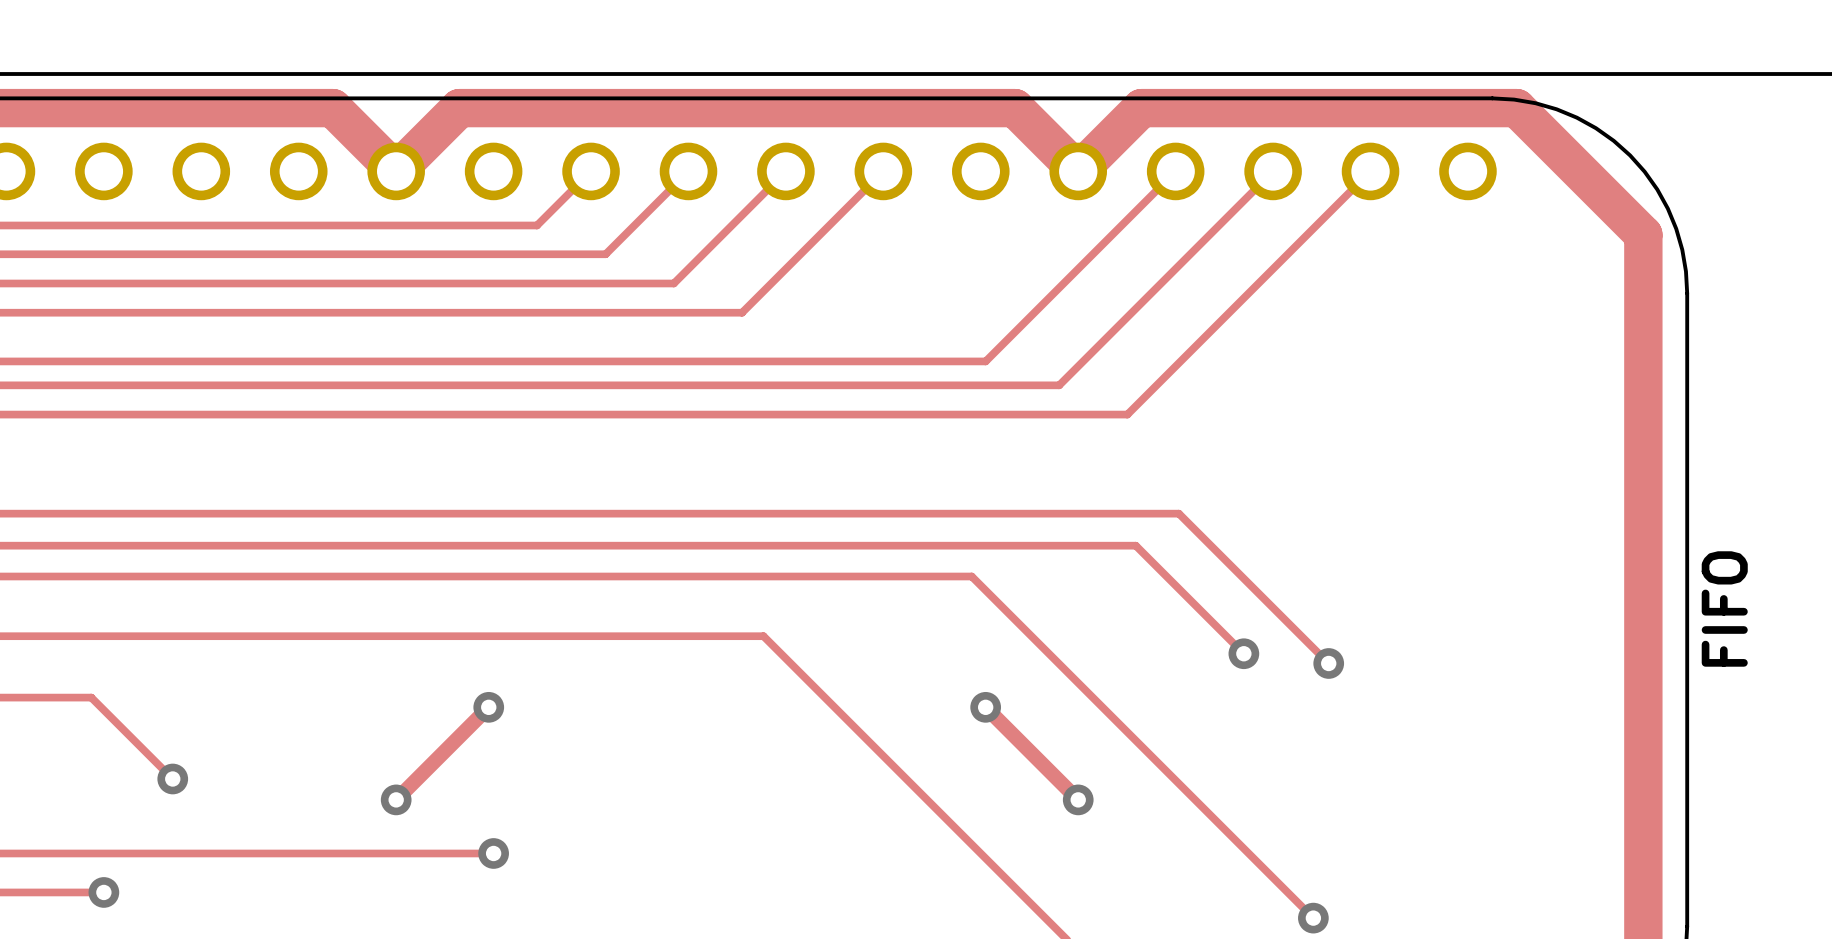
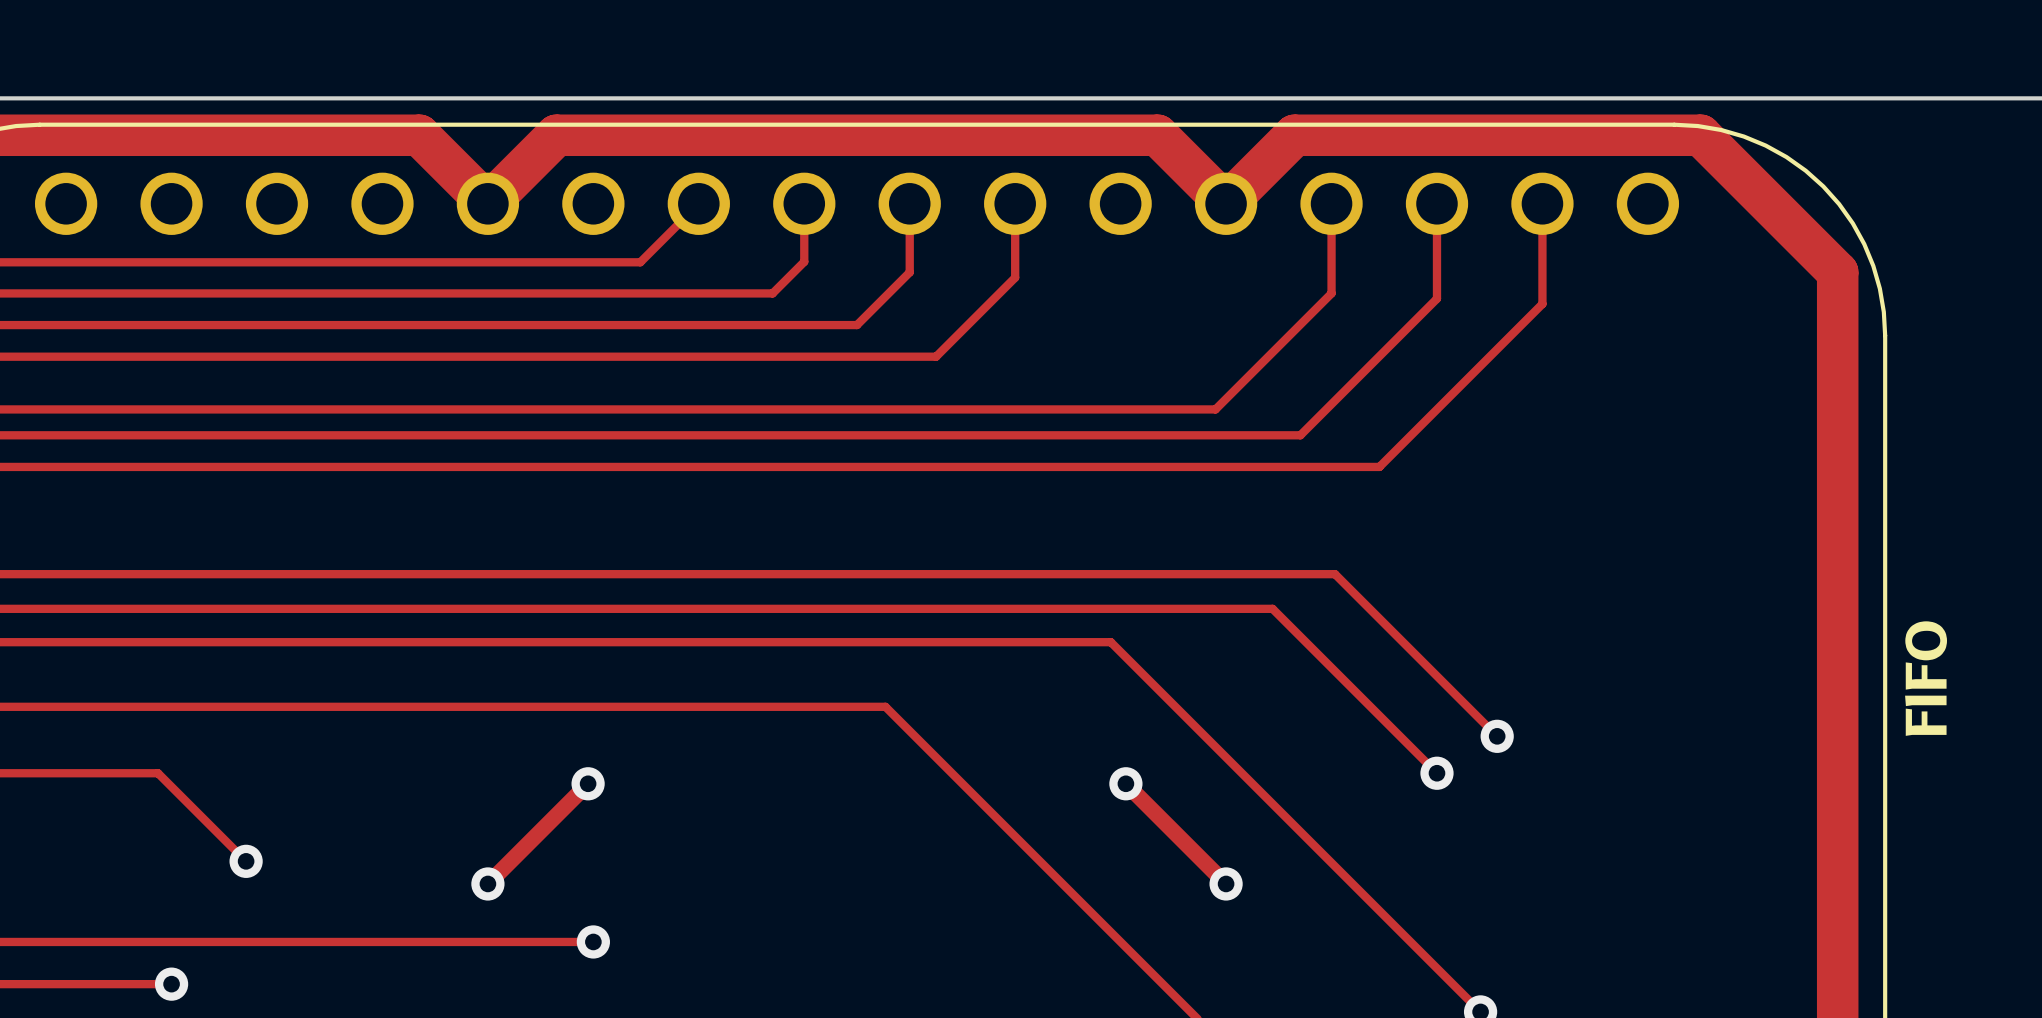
track: (688, 171) (605, 254) -> (804, 203) (804, 261) (772, 293) (714, 293)
track: (785, 171) (673, 283) -> (909, 203) (909, 272) (857, 325) (788, 325)
track: (883, 171) (742, 312) -> (1015, 203) (1015, 277) (936, 356) (862, 356)
track: (1175, 171) (985, 361) -> (1331, 203) (1331, 293) (1215, 409) (1125, 409)
track: (1273, 171) (1059, 385) -> (1436, 203) (1436, 298) (1300, 435) (1205, 435)
track: (1370, 171) (1127, 414) -> (1542, 203) (1542, 303) (1379, 466) (1279, 466)
track: (1121, 545) (1135, 545) (1243, 653) -> (1272, 608) (1436, 773)
via position: (1243, 653) -> (1436, 773)

